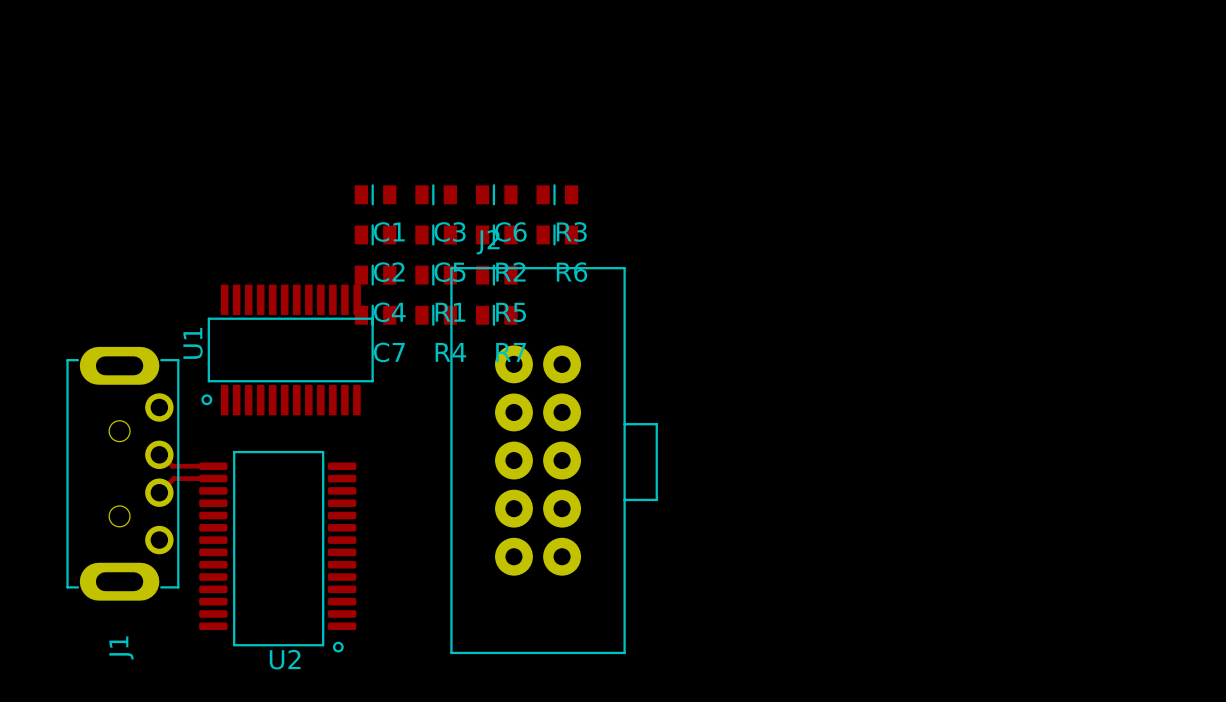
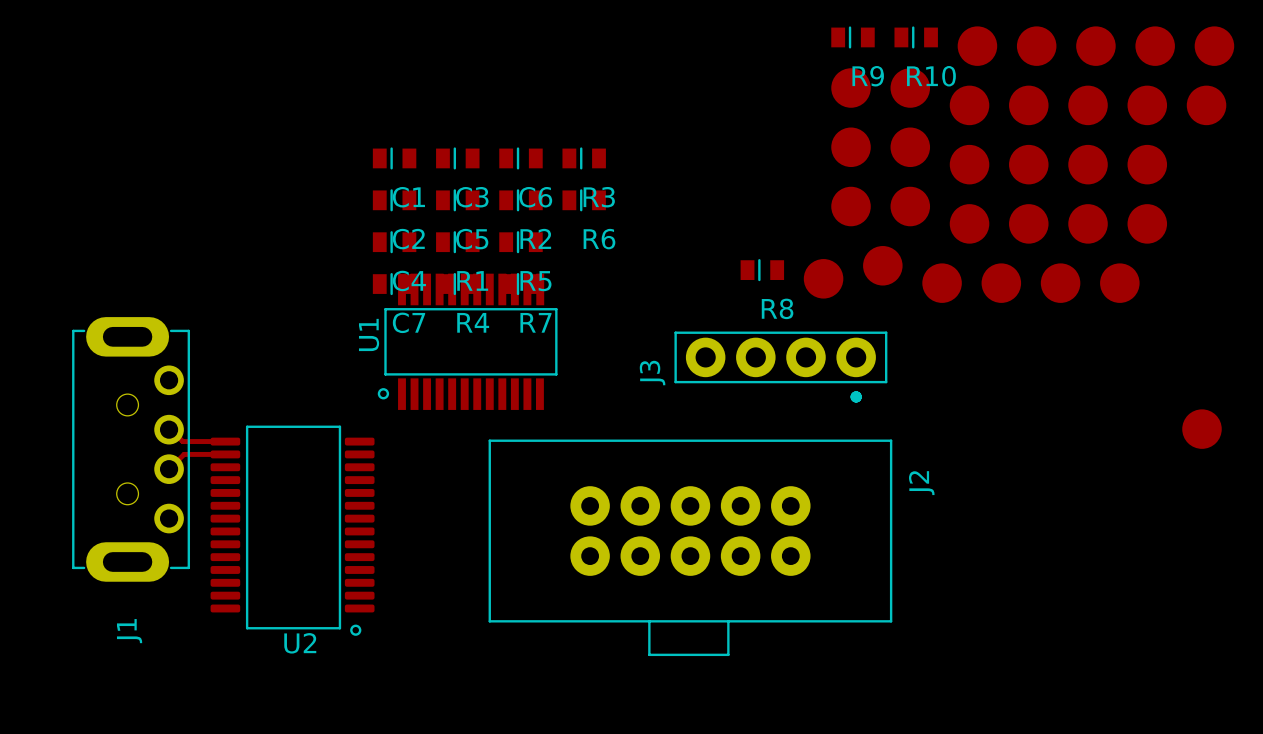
R9: none -> (853, 37)
R10: none -> (916, 37)
part: none -> (977, 46)
part: none -> (1036, 46)
part: none -> (1095, 46)
part: none -> (1155, 46)
part: none -> (1214, 46)
part: none -> (851, 88)
part: none -> (910, 88)
part: none -> (969, 105)
part: none -> (1028, 105)
part: none -> (1088, 105)
part: none -> (1147, 105)
part: none -> (1206, 105)
part: none -> (851, 147)
part: none -> (910, 147)
part: none -> (969, 164)
part: none -> (1028, 164)
part: none -> (1088, 164)
part: none -> (1147, 164)
part: none -> (851, 206)
part: none -> (910, 206)
part: none -> (969, 223)
part: none -> (1028, 223)
part: none -> (1088, 223)
part: none -> (1147, 223)
part: none -> (882, 265)
R8: none -> (762, 270)
part: none -> (823, 278)
part: none -> (942, 283)
part: none -> (1001, 283)
part: none -> (1060, 283)
part: none -> (1119, 283)
U1 position: (287, 349) -> (467, 341)
J3: none -> (780, 367)
part: none -> (1201, 429)
J2 rotation: 0° (554, 460) -> 90° clockwise (690, 547)

